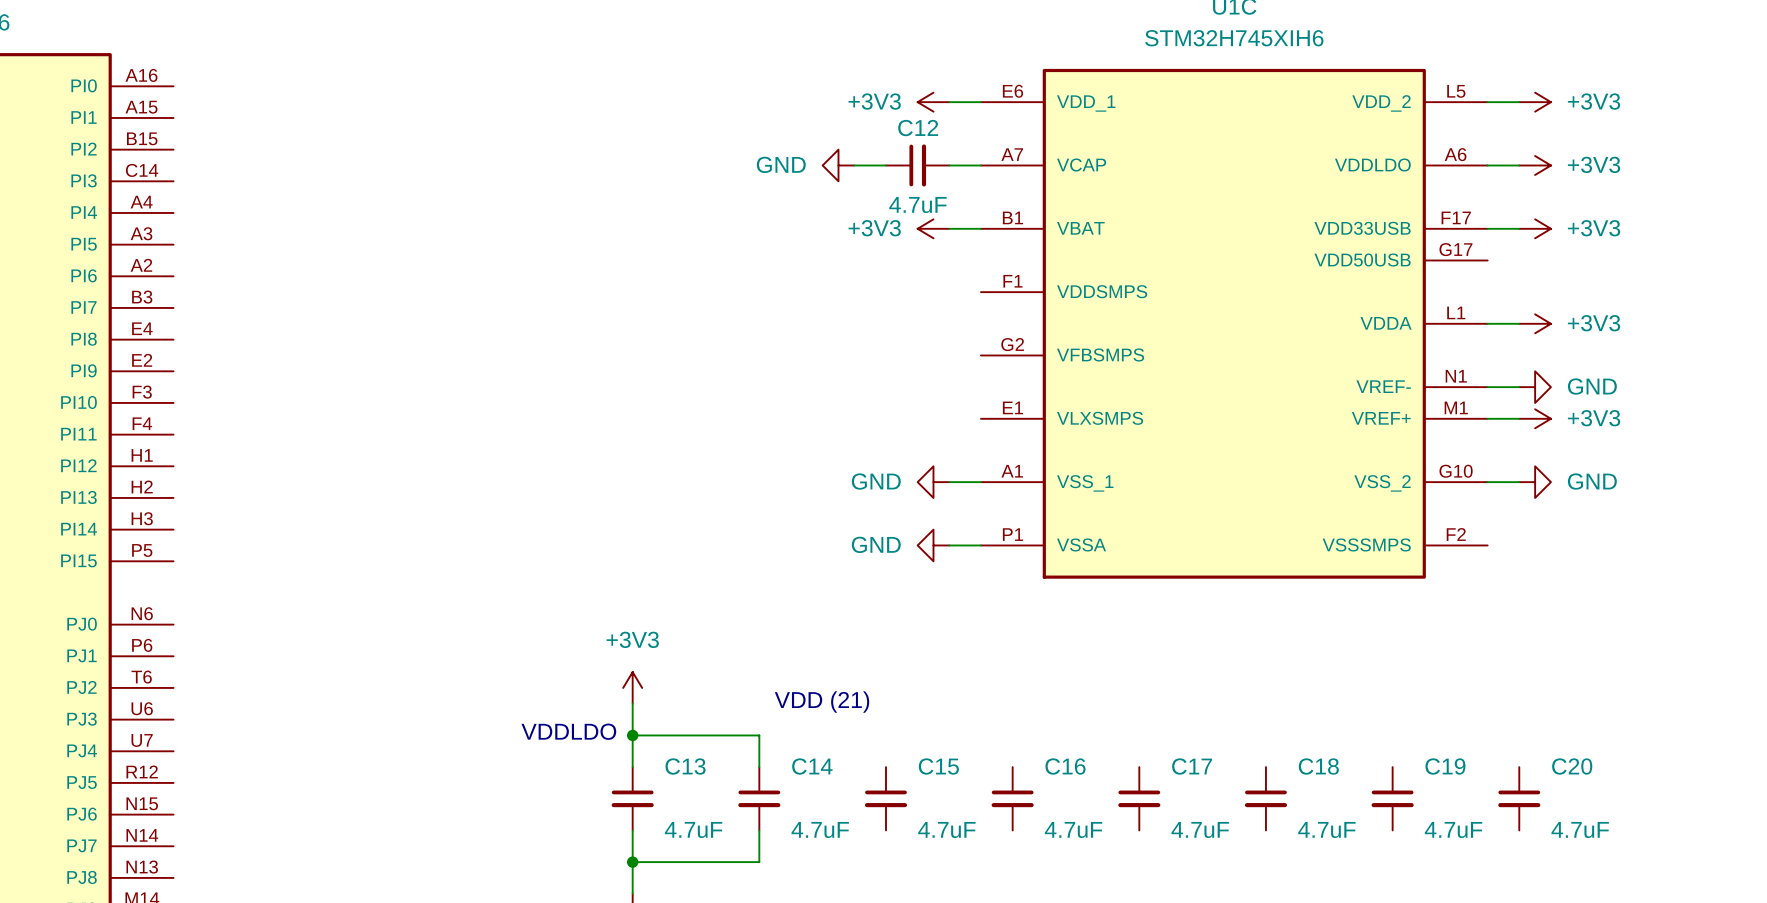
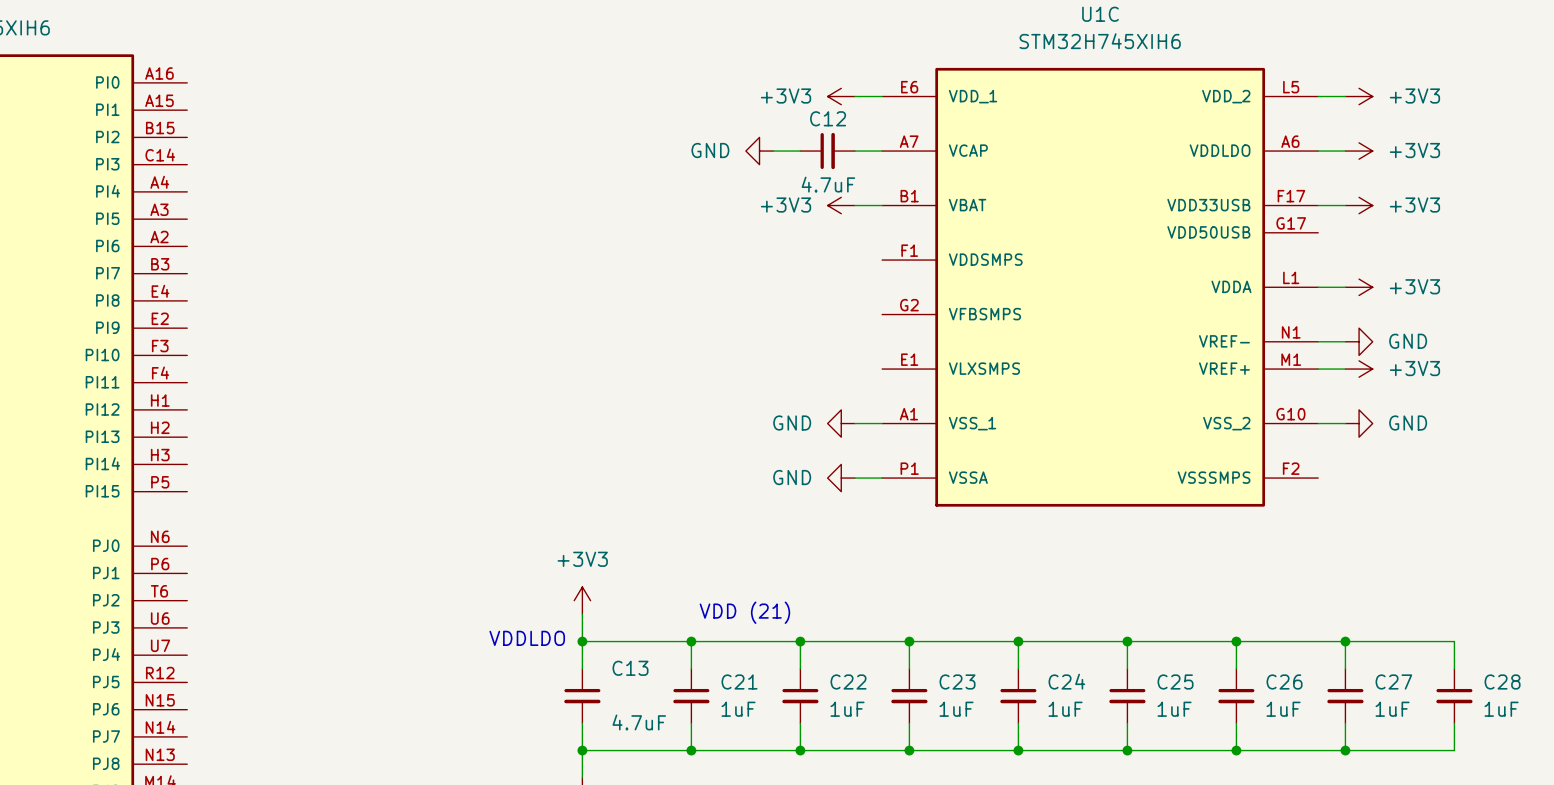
wire: none -> (691, 641) (1454, 641) (1454, 668)
junction: none -> (691, 641)
wire: none -> (800, 641) (800, 668)
junction: none -> (800, 641)
wire: none -> (909, 641) (909, 668)
junction: none -> (909, 641)
wire: none -> (1018, 641) (1018, 668)
junction: none -> (1018, 641)
wire: none -> (1127, 641) (1127, 668)
junction: none -> (1127, 641)
wire: none -> (1236, 641) (1236, 668)
junction: none -> (1236, 641)
wire: none -> (1345, 641) (1345, 668)
junction: none -> (1345, 641)
C14 name: C14 (812, 766) -> C21 (739, 681)
C15 name: C15 (938, 766) -> C22 (848, 681)
C16 name: C16 (1065, 766) -> C23 (957, 681)
C17 name: C17 (1192, 766) -> C24 (1066, 681)
C18 name: C18 (1318, 766) -> C25 (1175, 681)
C19 name: C19 (1445, 766) -> C26 (1284, 681)
C20 name: C20 (1572, 766) -> C27 (1393, 681)
C28: none -> 1uF (1454, 696)
C14 value: 4.7uF (820, 829) -> 1uF (738, 709)
C15 value: 4.7uF (946, 829) -> 1uF (847, 709)
C16 value: 4.7uF (1073, 829) -> 1uF (956, 709)
C17 value: 4.7uF (1200, 829) -> 1uF (1065, 709)
C18 value: 4.7uF (1326, 829) -> 1uF (1174, 709)
C19 value: 4.7uF (1453, 829) -> 1uF (1283, 709)
C20 value: 4.7uF (1580, 829) -> 1uF (1392, 709)
wire: none -> (800, 723) (800, 750)
wire: none -> (909, 723) (909, 750)
wire: none -> (1018, 723) (1018, 750)
wire: none -> (1127, 723) (1127, 750)
wire: none -> (1236, 723) (1236, 750)
wire: none -> (1345, 723) (1345, 750)
wire: none -> (1454, 723) (1454, 750) (691, 750)
junction: none -> (691, 750)
junction: none -> (800, 750)
junction: none -> (909, 750)
junction: none -> (1018, 750)
junction: none -> (1127, 750)
junction: none -> (1236, 750)
junction: none -> (1345, 750)

